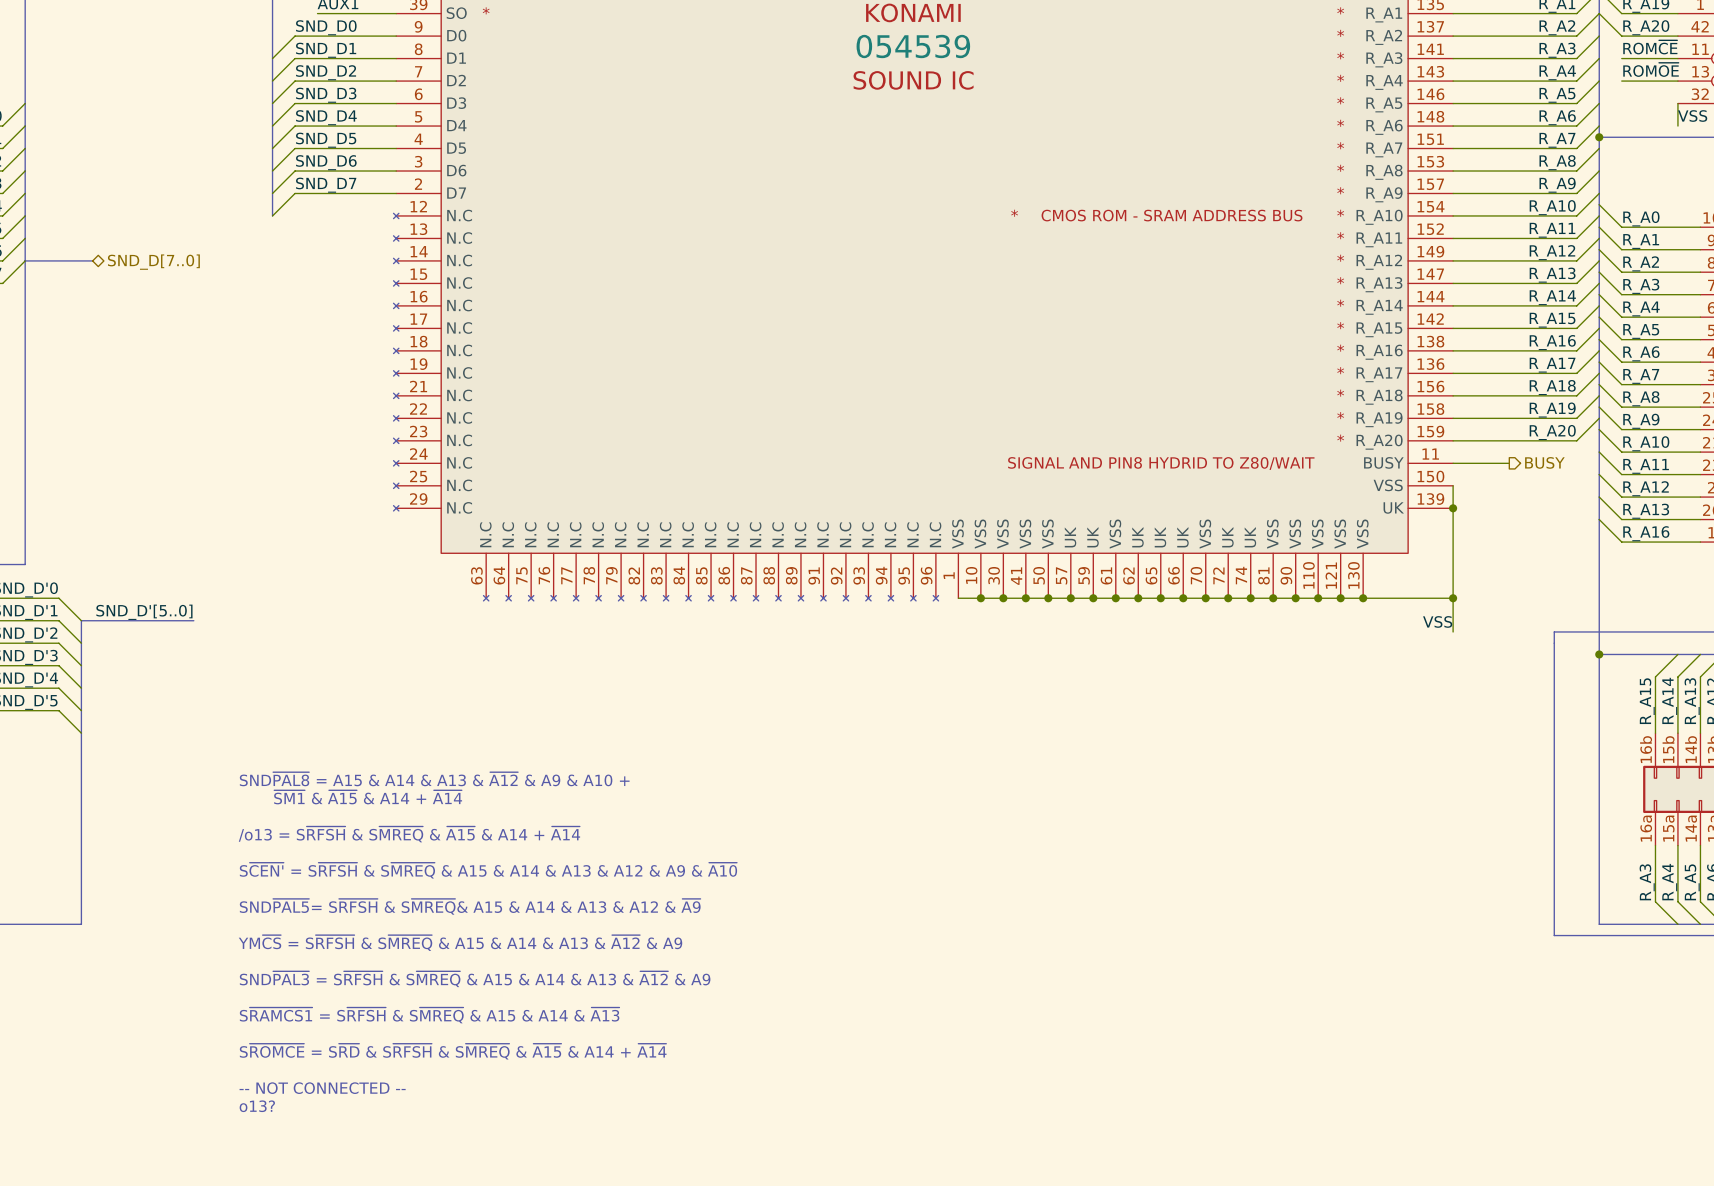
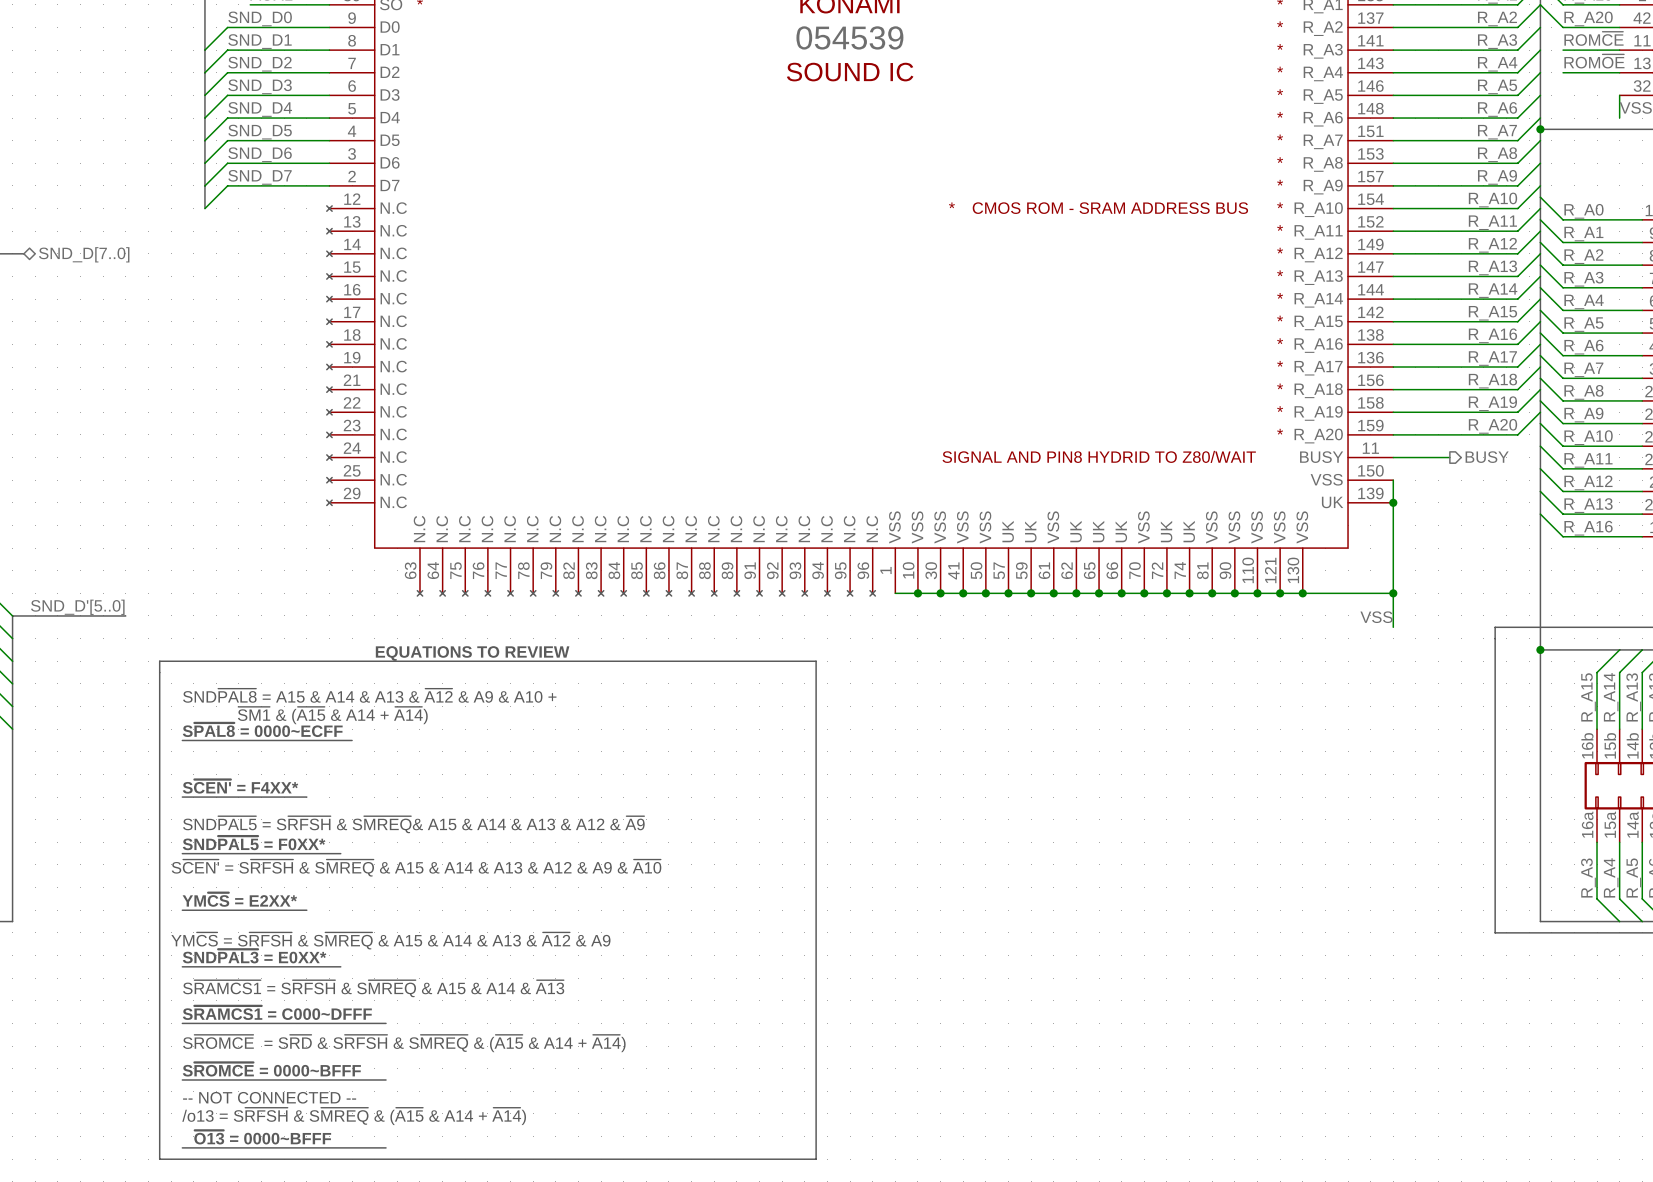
text: none -> EQUATIONS TO REVIEW (472, 653)
line: none -> (159, 661) (816, 661) (816, 1159) (159, 1159) (159, 661)
text: none -> ~{SM1} & (~{A15} & A14 + ~{A14}) (332, 715)
text: none -> S~{PAL8} = 0000~ECFF (262, 729)
line: none -> (182, 740) (352, 740)
text position: SND~{PAL8} = A15 & A14 & A13 & ~{A12} & A9 & A10 + (434, 779) -> SND~{PAL8} = A15 & A14 & A13 & ~{A12} & A9 & A10 + (369, 695)
text: none -> S~{CEN'} = F4XX* (240, 786)
text: ~{SM1} & ~{A15} & A14 + ~{A14} (368, 797) -> none
line: none -> (182, 797) (306, 797)
text: /o13 = S~{RFSH} & S~{MREQ} & ~{A15} & A14 + ~{A14} (409, 834) -> SND~{PAL5} = S~{RFSH} & S~{MREQ}& A15 & A14 & A13 & A12 & ~{A9} (413, 824)
text: none -> SND~{PAL5} = F0XX* (254, 843)
line: none -> (182, 853) (340, 853)
text: none -> YM~{CS} = E2XX* (239, 899)
text: SND~{PAL5}= S~{RFSH} & S~{MREQ}& A15 & A14 & A13 & A12 & ~{A9} (470, 906) -> none
line: none -> (182, 910) (306, 910)
text: none -> SND~{PAL3} = E0XX* (254, 956)
line: none -> (182, 966) (340, 966)
text: SND~{PAL3} = S~{RFSH} & S~{MREQ} & A15 & A14 & A13 & ~{A12} & A9 (475, 979) -> none
text: none -> S~{RAMCS1} = C000~DFFF (277, 1012)
text position: S~{RAMCS1} = S~{RFSH} & S~{MREQ} & A15 & A14 & ~{A13} (429, 1015) -> S~{RAMCS1} = S~{RFSH} & S~{MREQ} & A15 & A14 & ~{A13} (373, 988)
line: none -> (182, 1023) (386, 1023)
text: S~{ROMCE} = S~{RD} & S~{RFSH} & S~{MREQ} & ~{A15} & A14 + ~{A14} (453, 1051) -> S~{ROMCE} = S~{RD} & S~{RFSH} & S~{MREQ} & (~{A15} & A14 + ~{A14}) (404, 1043)
text: none -> S~{ROMCE} = 0000~BFFF (271, 1069)
line: none -> (182, 1079) (386, 1079)
text position: -- NOT CONNECTED -- (322, 1088) -> -- NOT CONNECTED -- (269, 1097)
text: o13? (257, 1106) -> none
text: none -> /o13 = S~{RFSH} & S~{MREQ} & (~{A15} & A14 + ~{A14}) (354, 1116)
text: none -> ~{O13} = 0000~BFFF (262, 1137)
line: none -> (182, 1147) (386, 1147)

